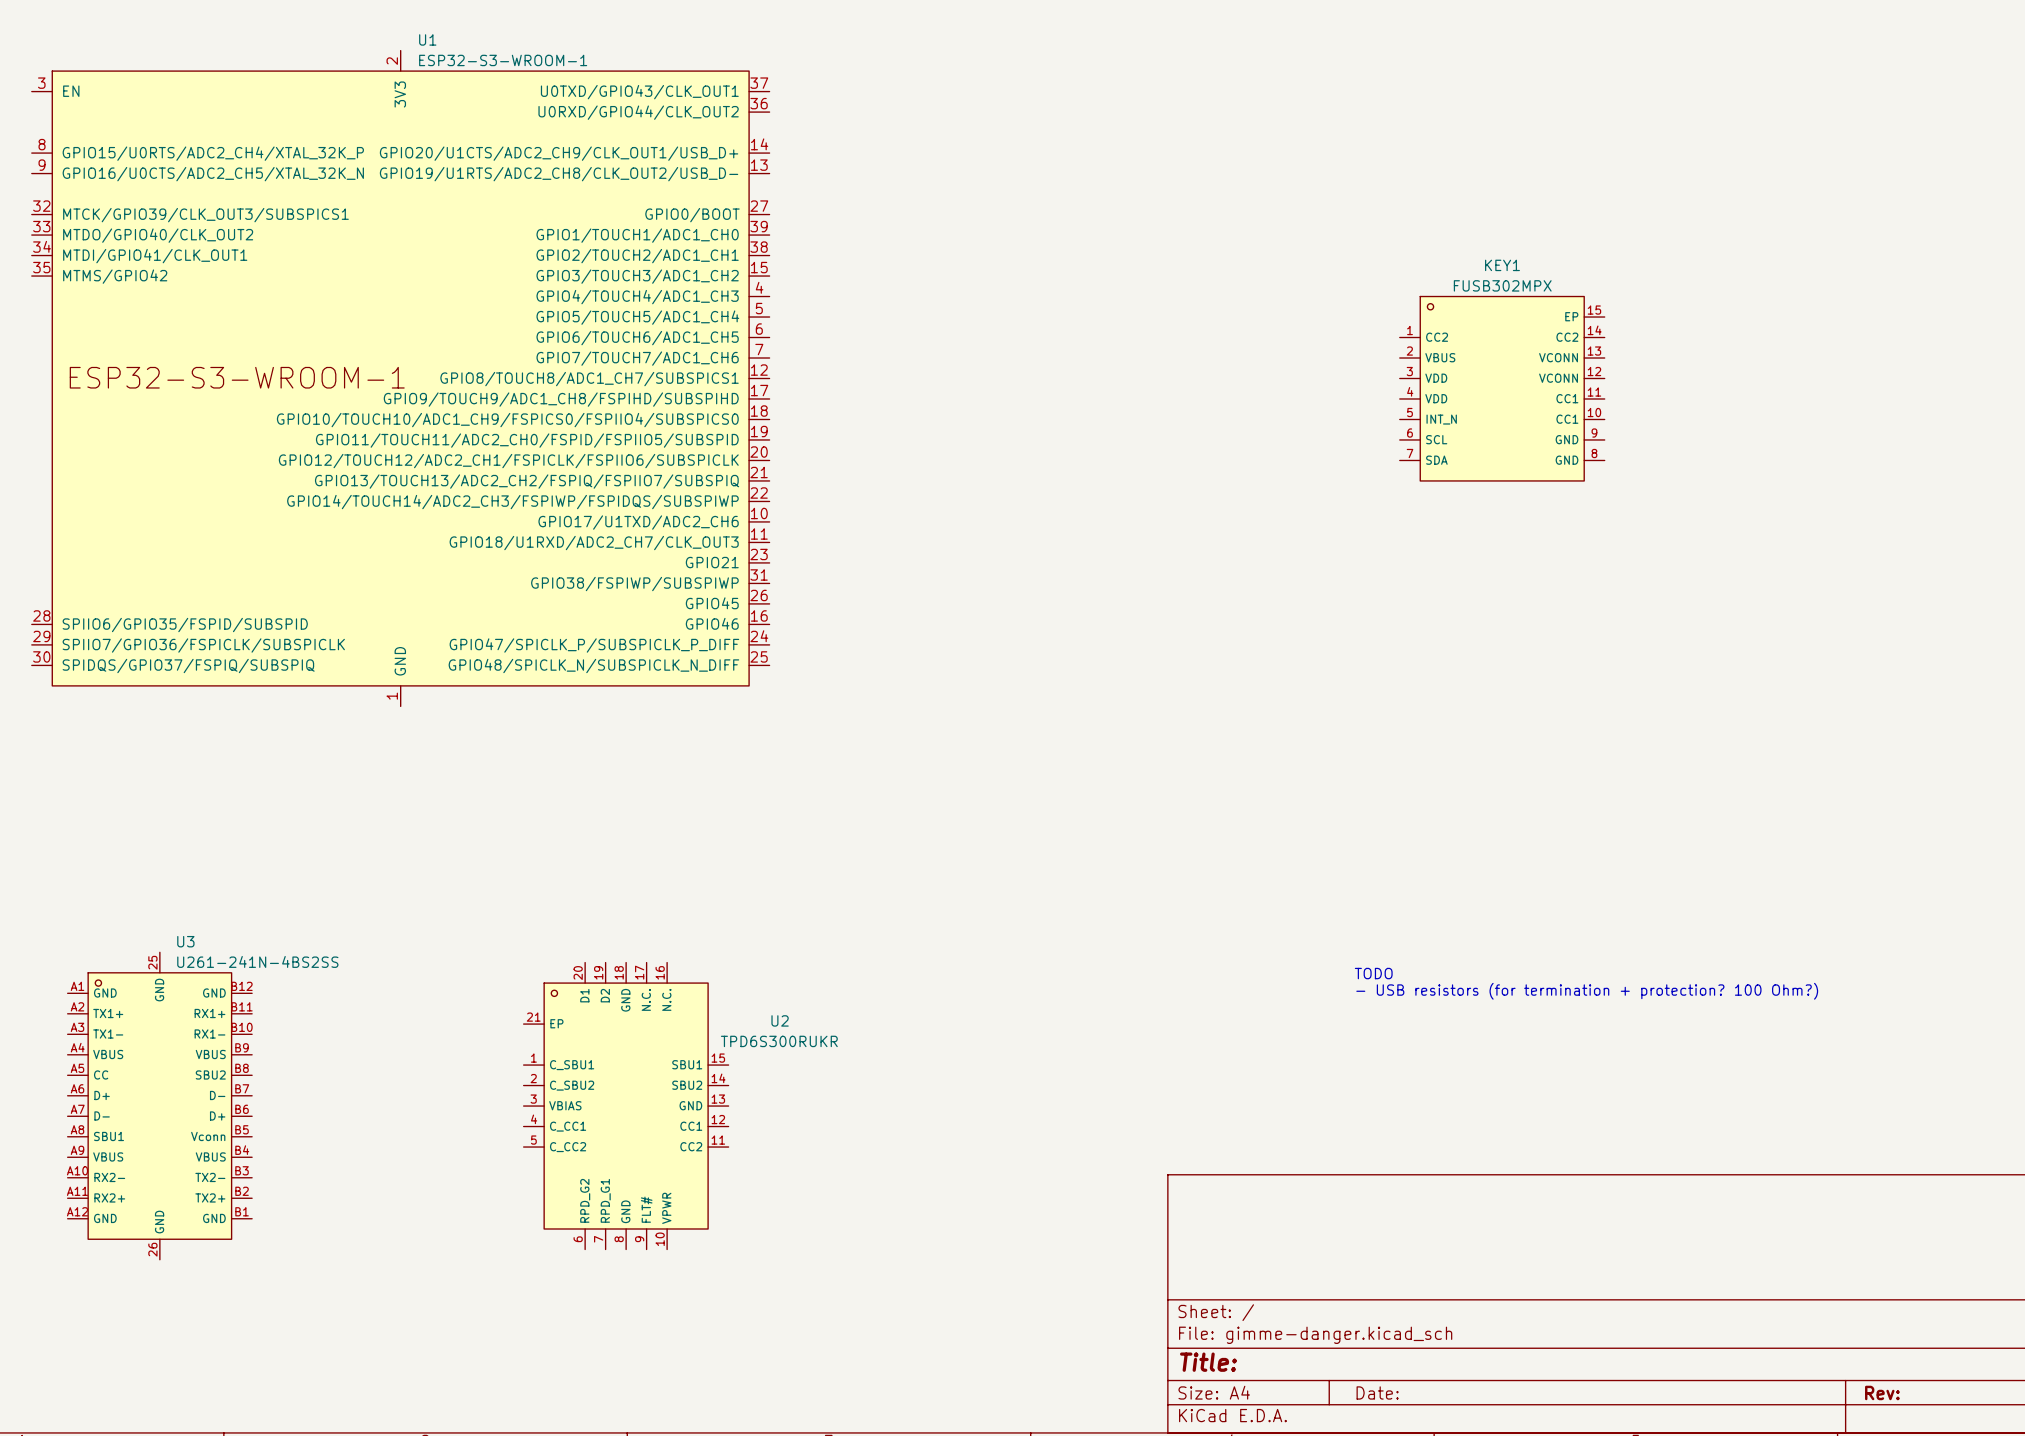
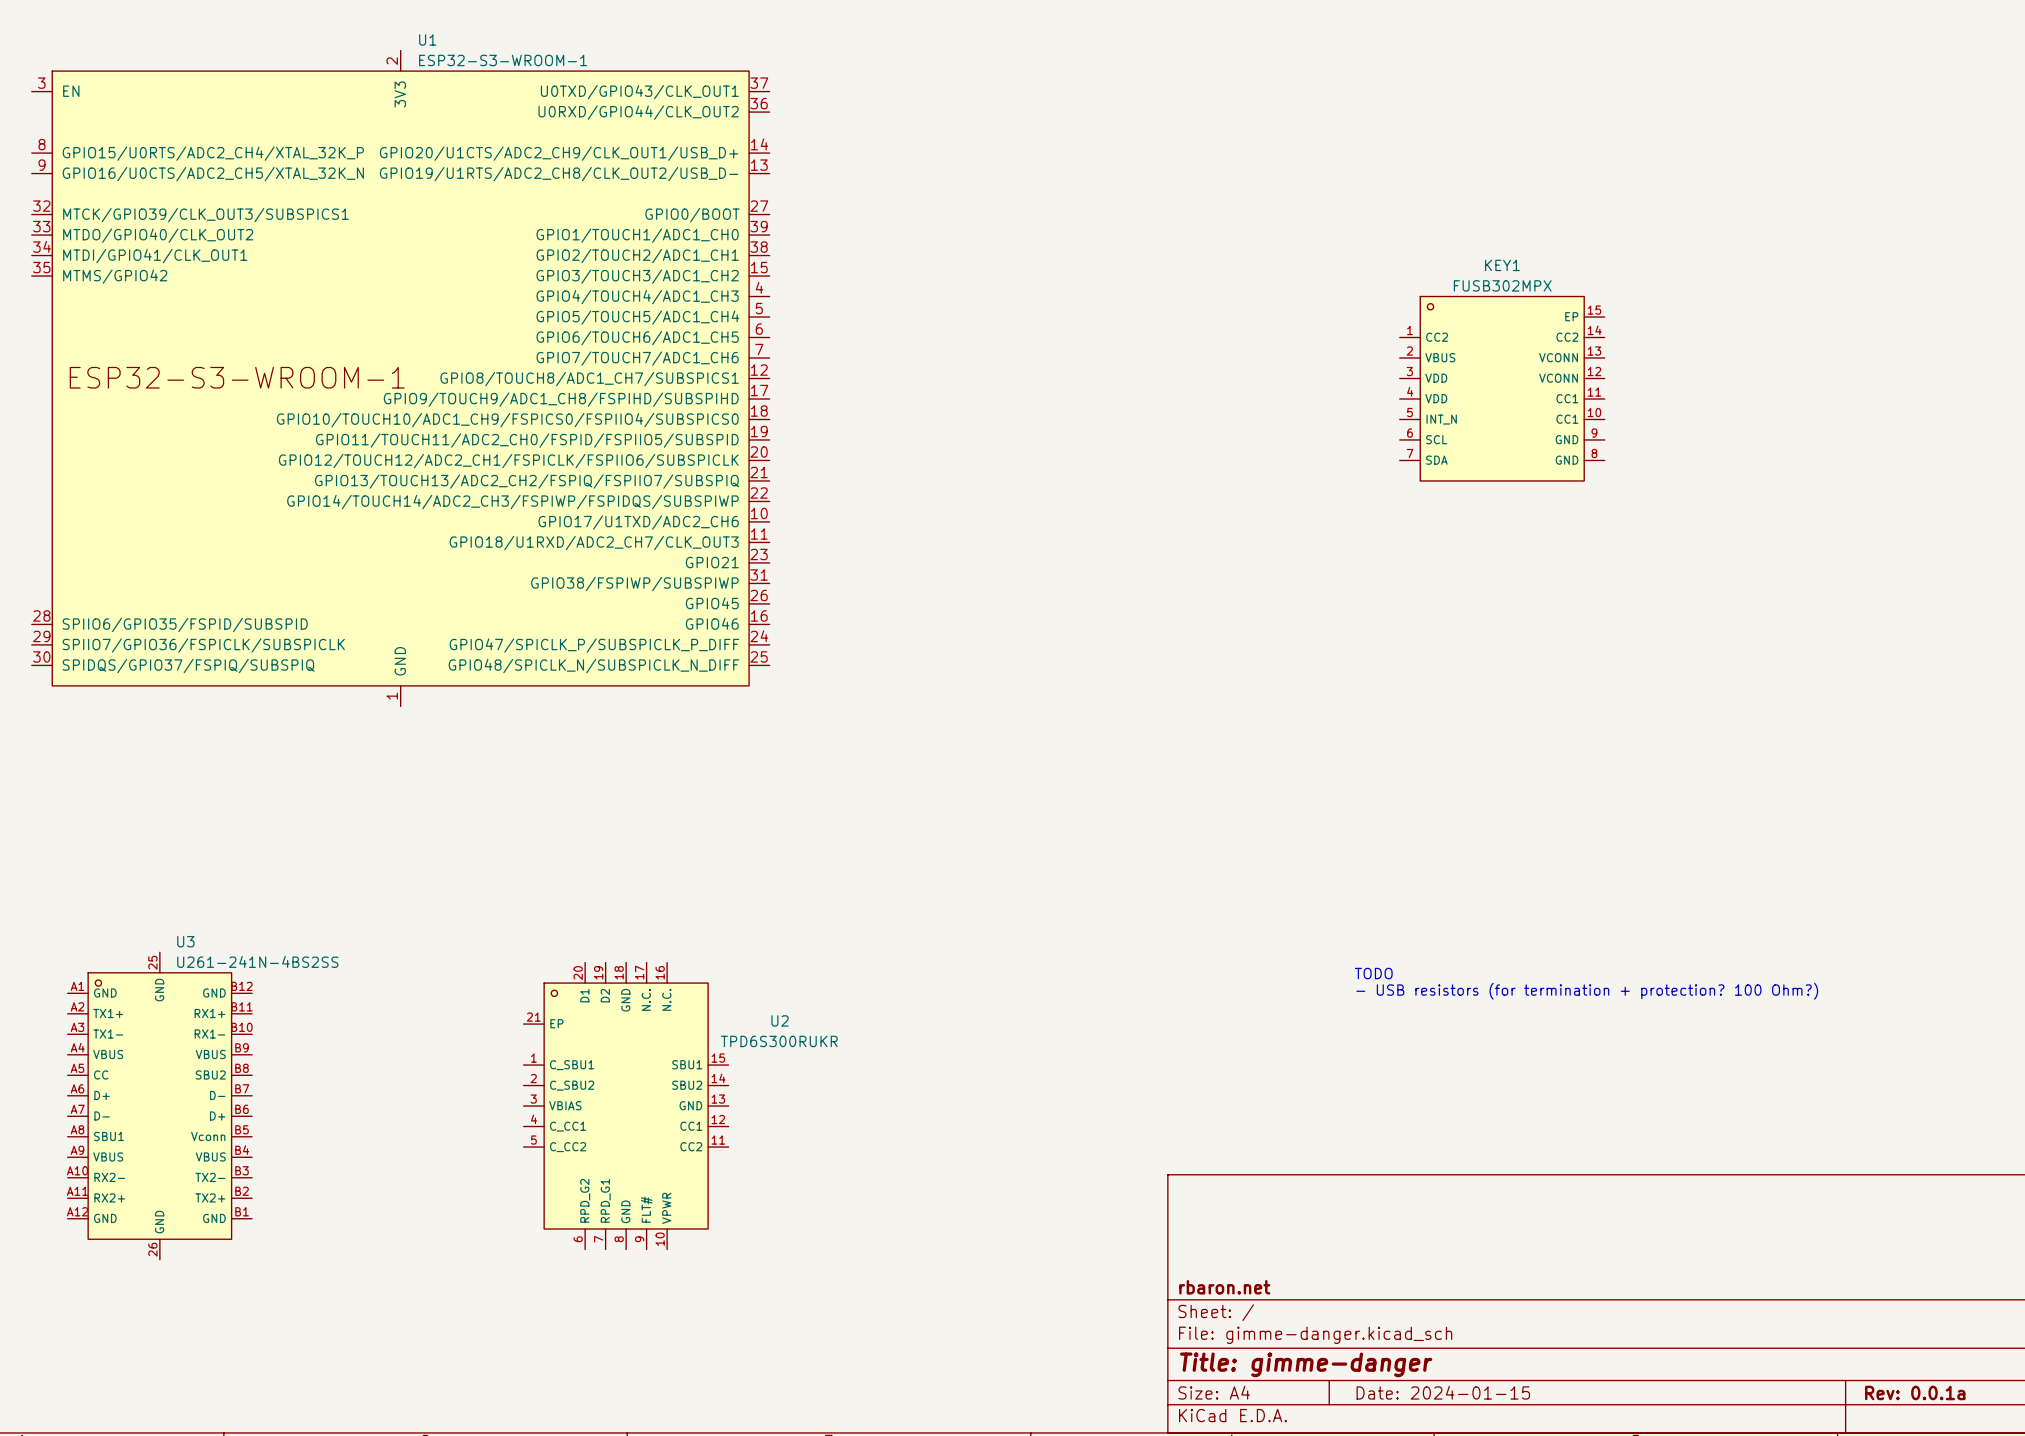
title block: none -> rbaron.net (1224, 1287)
title block: Title: (1208, 1362) -> Title: gimme-danger (1306, 1364)
title block: Date: (1377, 1392) -> Date: 2024-01-15 (1443, 1392)
title block: Rev: (1882, 1392) -> Rev: 0.0.1a (1915, 1392)

